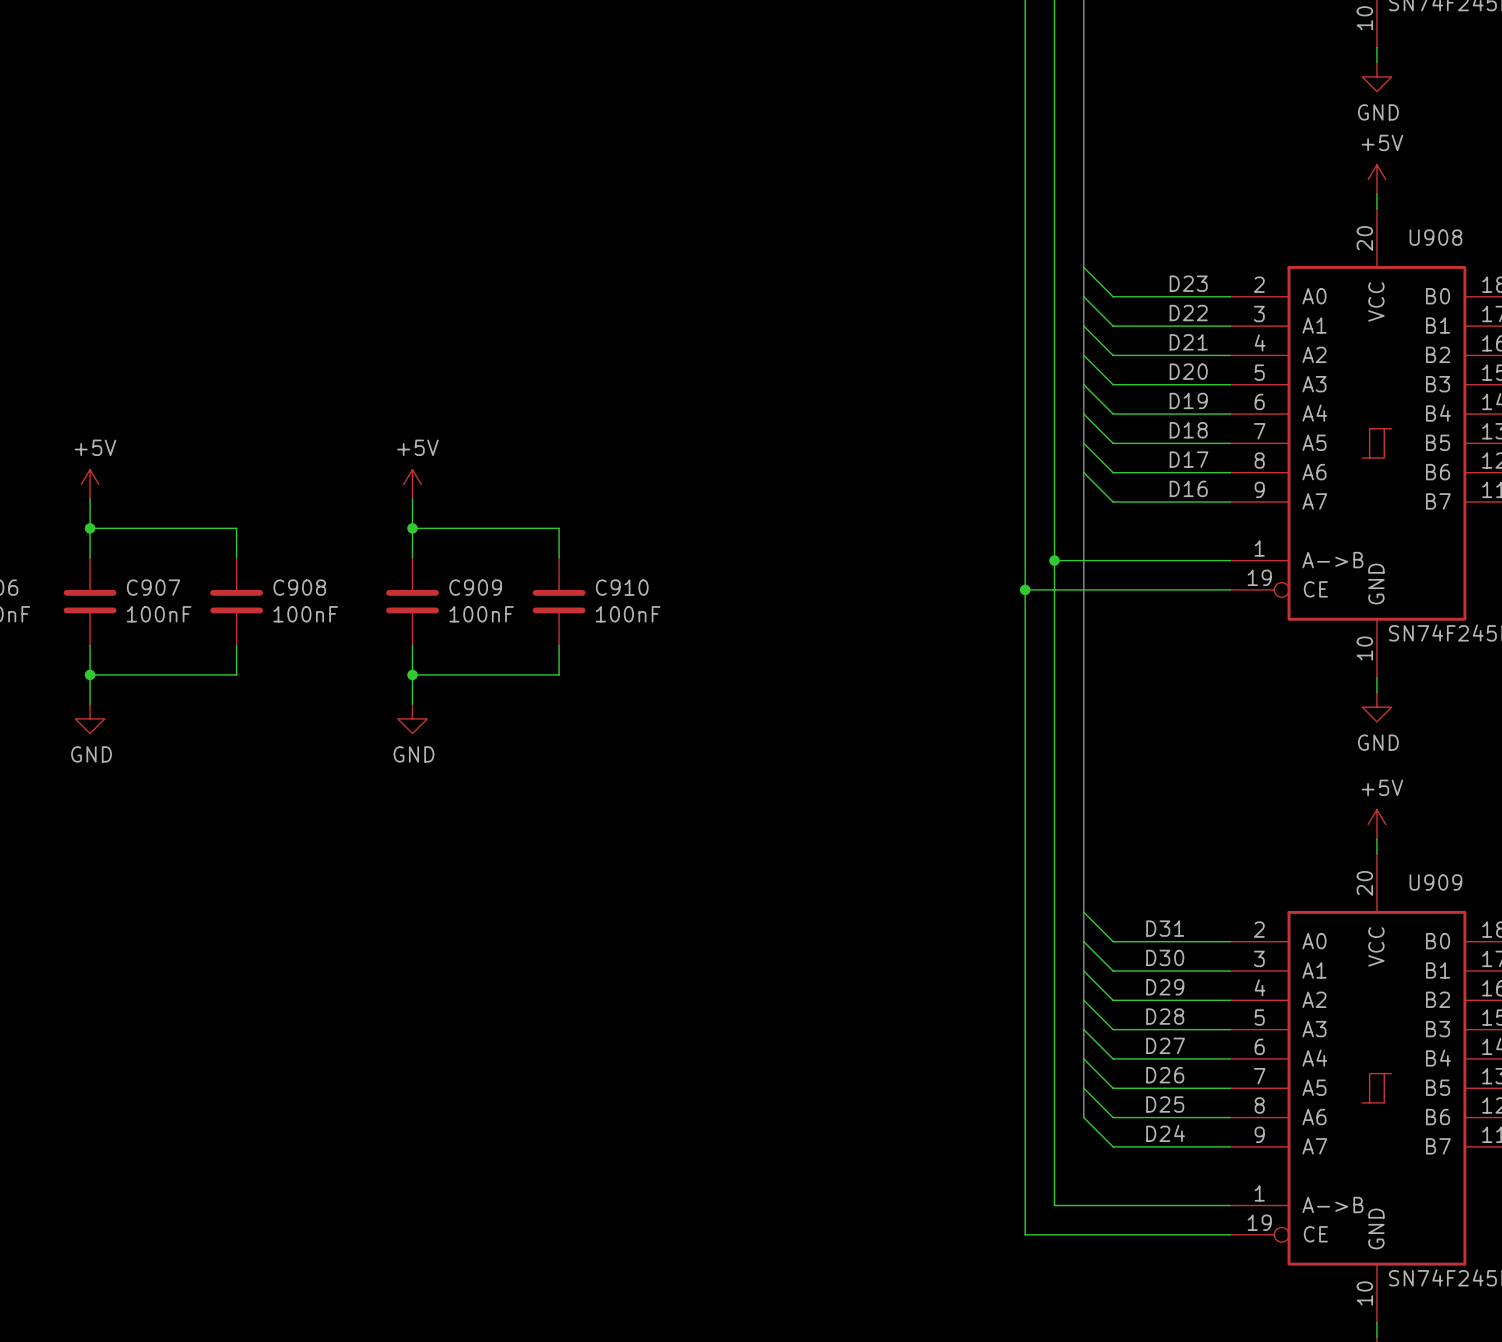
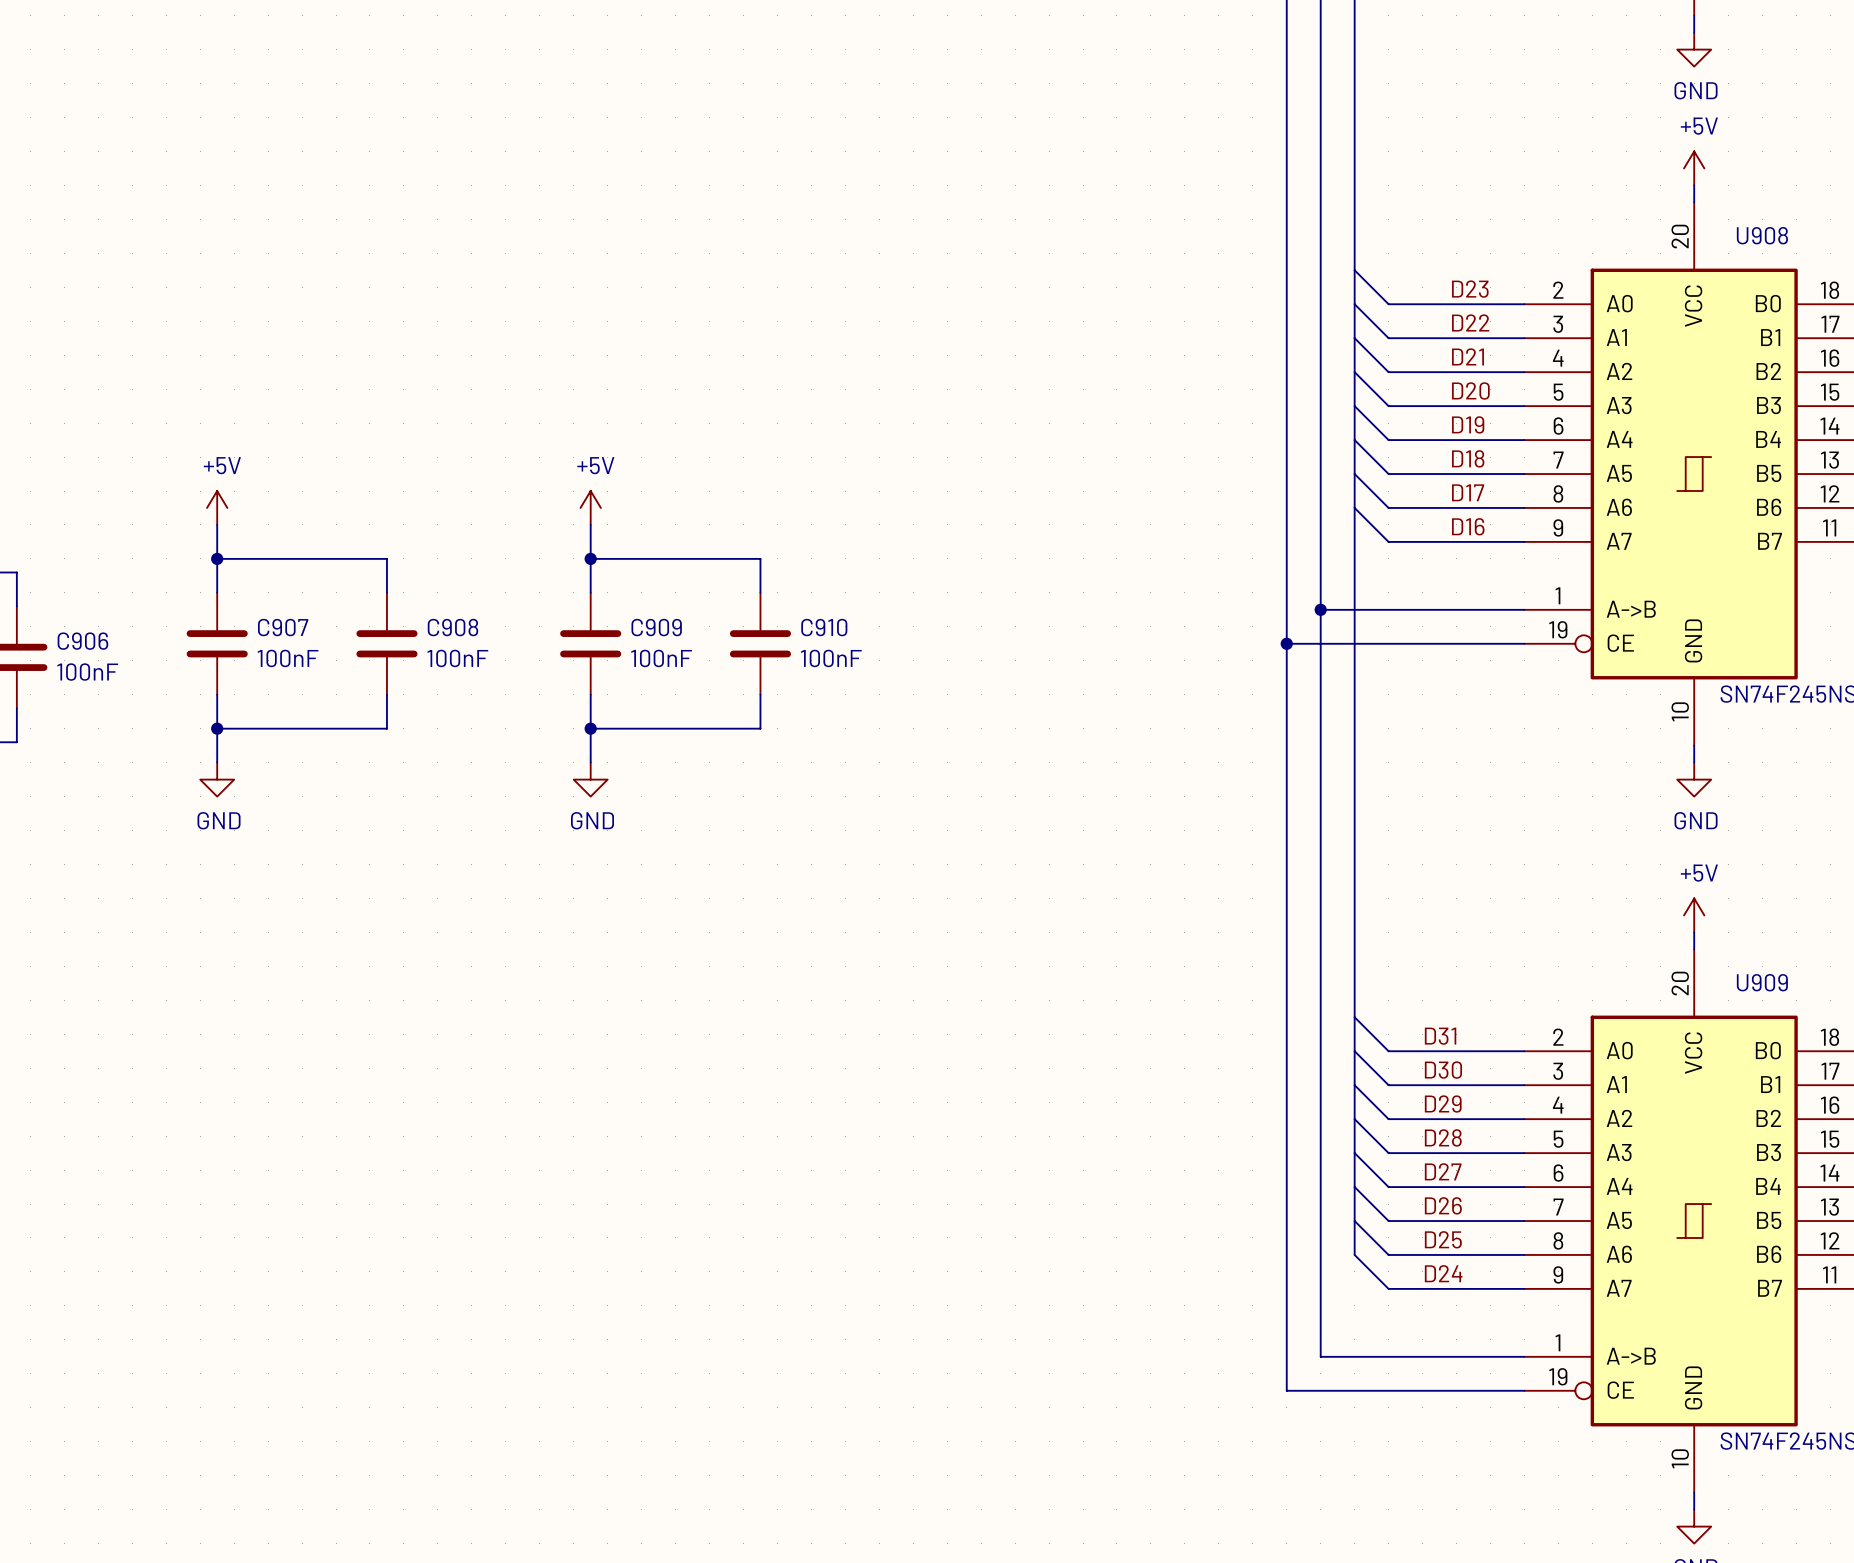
power symbol position: +5V (90, 484) -> +5V (217, 507)
power symbol position: +5V (412, 484) -> +5V (590, 507)
wire: (90, 499) (90, 557) -> (217, 524) (217, 592)
wire: (412, 499) (412, 557) -> (590, 524) (590, 592)
wire: (90, 528) (236, 528) (236, 557) -> (217, 558) (386, 558) (386, 592)
junction position: (90, 528) -> (217, 558)
wire: (412, 528) (559, 528) (559, 557) -> (590, 558) (760, 558) (760, 592)
junction position: (412, 528) -> (590, 558)
C907 position: (90, 601) -> (217, 643)
C908 position: (236, 601) -> (386, 643)
C909 position: (412, 601) -> (590, 643)
C910 position: (559, 601) -> (760, 643)
wire: (90, 645) (90, 704) -> (217, 694) (217, 762)
wire: (236, 645) (236, 674) (90, 674) -> (386, 694) (386, 728) (217, 728)
wire: (412, 645) (412, 704) -> (590, 694) (590, 762)
wire: (559, 645) (559, 674) (412, 674) -> (760, 694) (760, 728) (590, 728)
junction position: (90, 674) -> (217, 728)
junction position: (412, 674) -> (590, 728)
power symbol position: GND (90, 718) -> GND (217, 779)
power symbol position: GND (412, 718) -> GND (590, 779)

